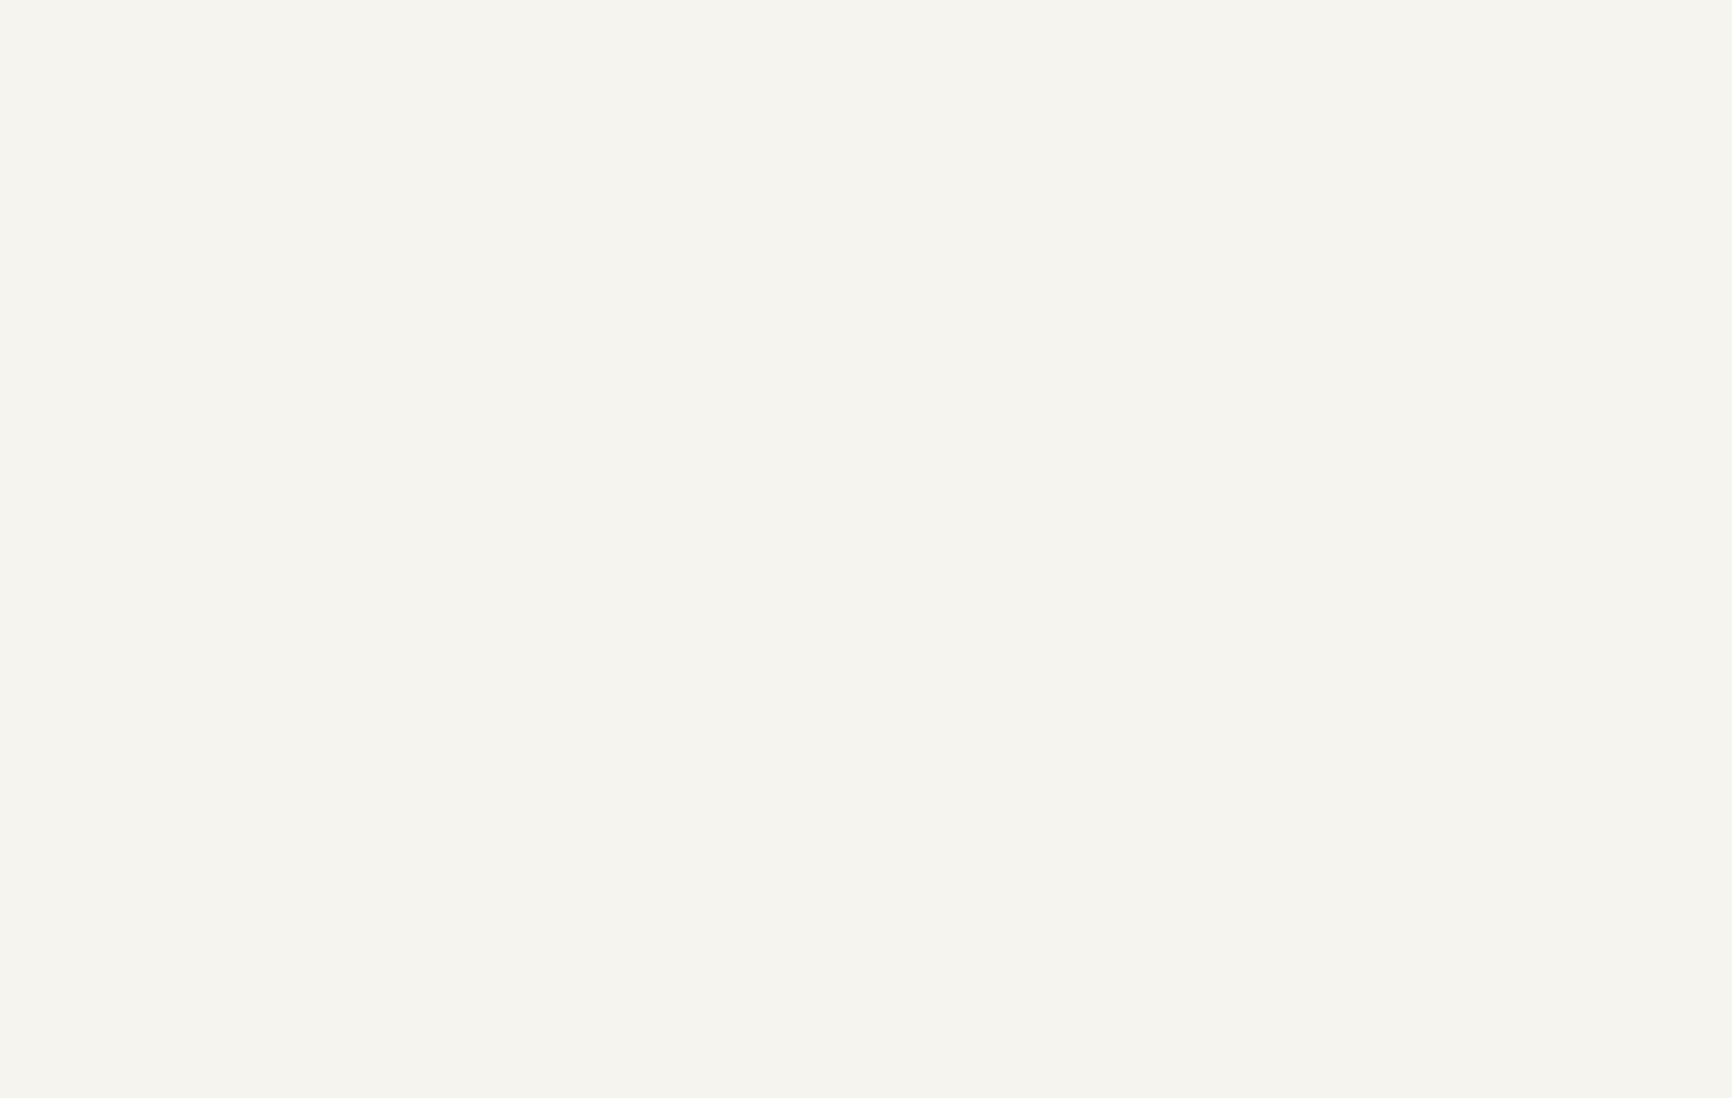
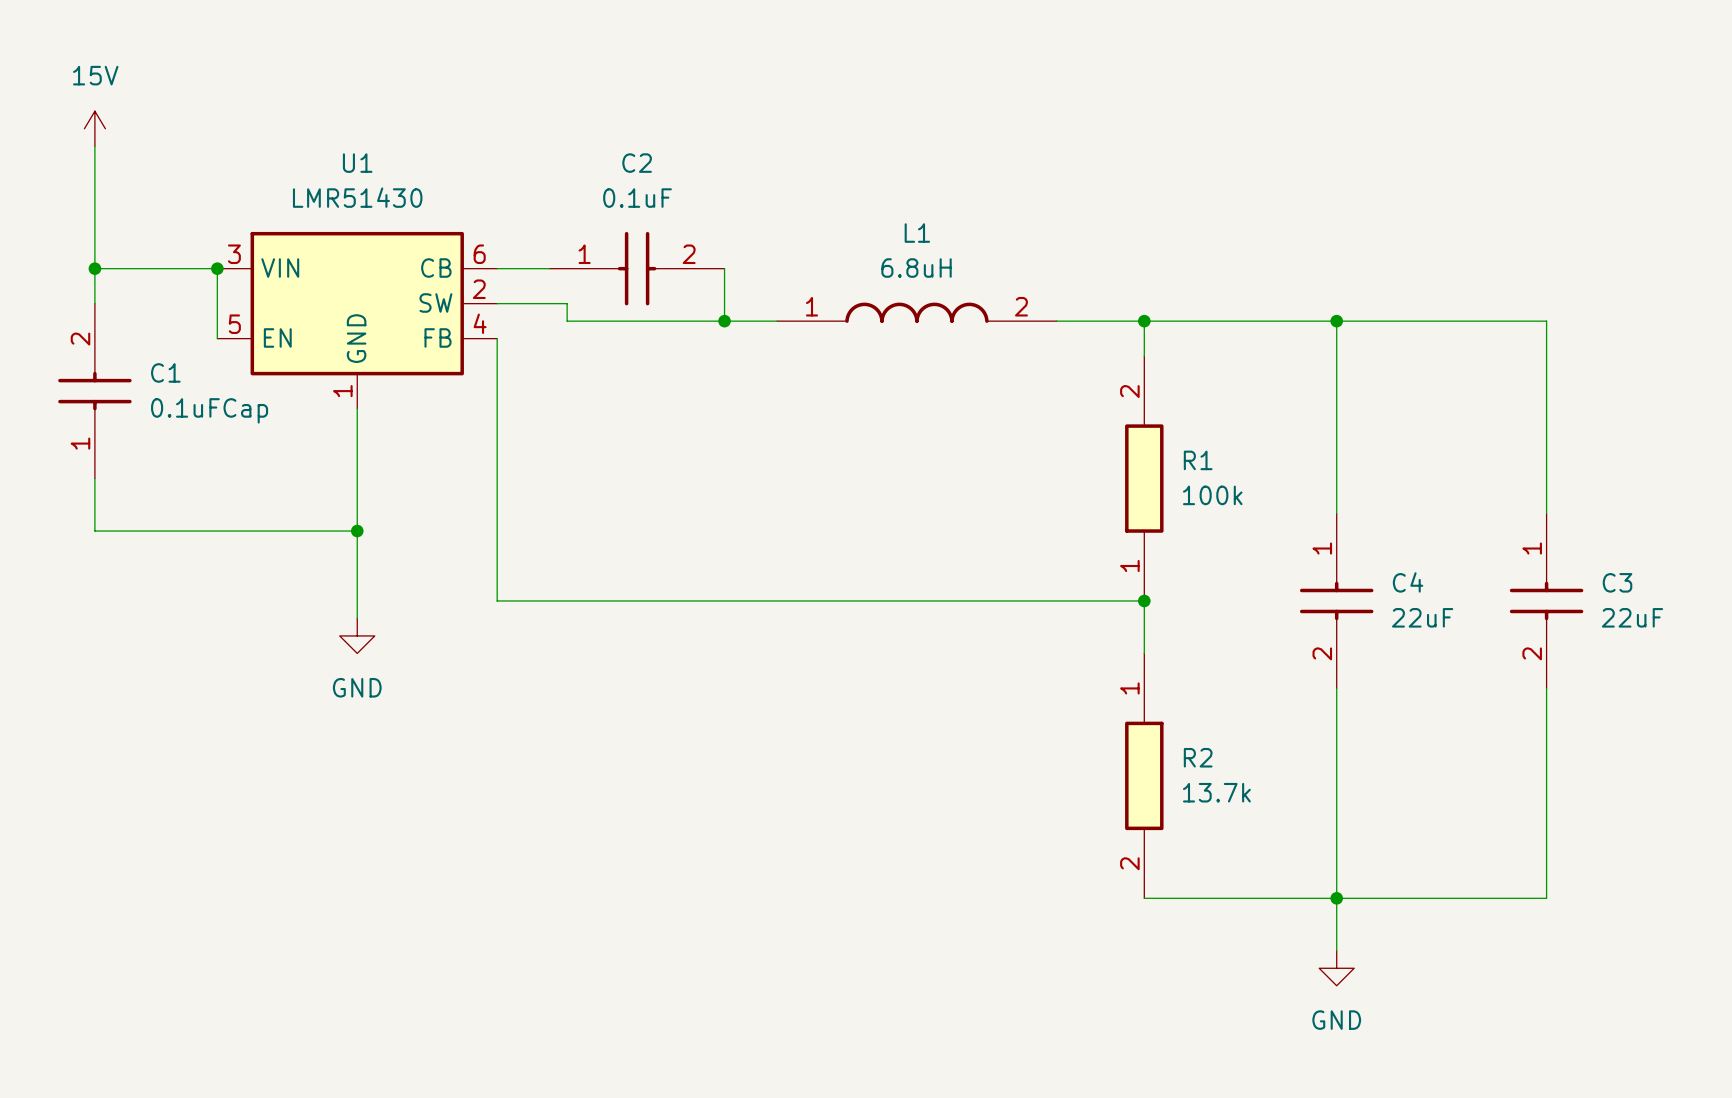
power symbol: none -> 15V (94, 128)
wire: none -> (94, 146) (94, 303)
wire: none -> (94, 268) (217, 268) (217, 338)
junction: none -> (94, 268)
junction: none -> (217, 268)
wire: none -> (497, 268) (549, 268)
C2: none -> 0.1uF (637, 268)
wire: none -> (724, 268) (724, 321)
wire: none -> (497, 303) (567, 303) (567, 321) (777, 321)
L1: none -> 6.8uH (916, 312)
U1: none -> LMR51430 (357, 320)
junction: none -> (724, 321)
wire: none -> (1056, 321) (1546, 321) (1546, 513)
wire: none -> (1144, 321) (1144, 356)
junction: none -> (1144, 321)
wire: none -> (1336, 321) (1336, 513)
junction: none -> (1336, 321)
wire: none -> (497, 338) (497, 600) (1144, 600) (1144, 653)
C1: none -> 0.1uFCap (94, 391)
wire: none -> (357, 408) (357, 618)
wire: none -> (94, 478) (94, 531) (357, 531)
R1: none -> 100k (1144, 478)
junction: none -> (357, 531)
junction: none -> (1144, 600)
C4: none -> 22uF (1336, 600)
C3: none -> 22uF (1546, 600)
power symbol: none -> GND (357, 635)
wire: none -> (1336, 688) (1336, 950)
wire: none -> (1546, 688) (1546, 898) (1144, 898)
R2: none -> 13.7k (1144, 775)
junction: none -> (1336, 898)
power symbol: none -> GND (1336, 968)

